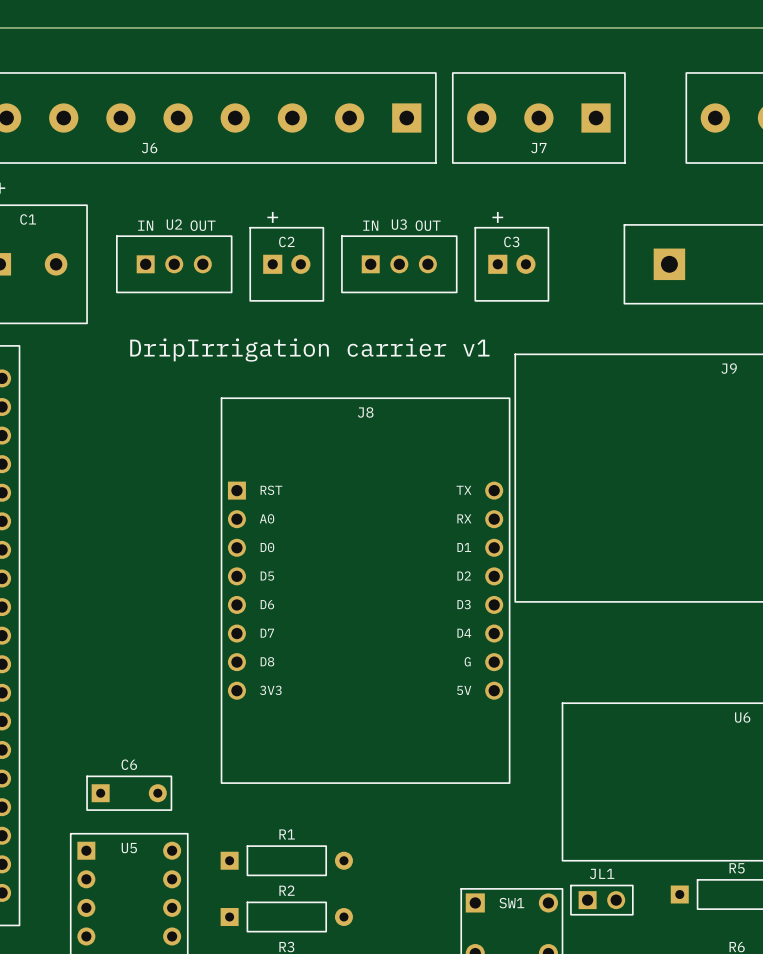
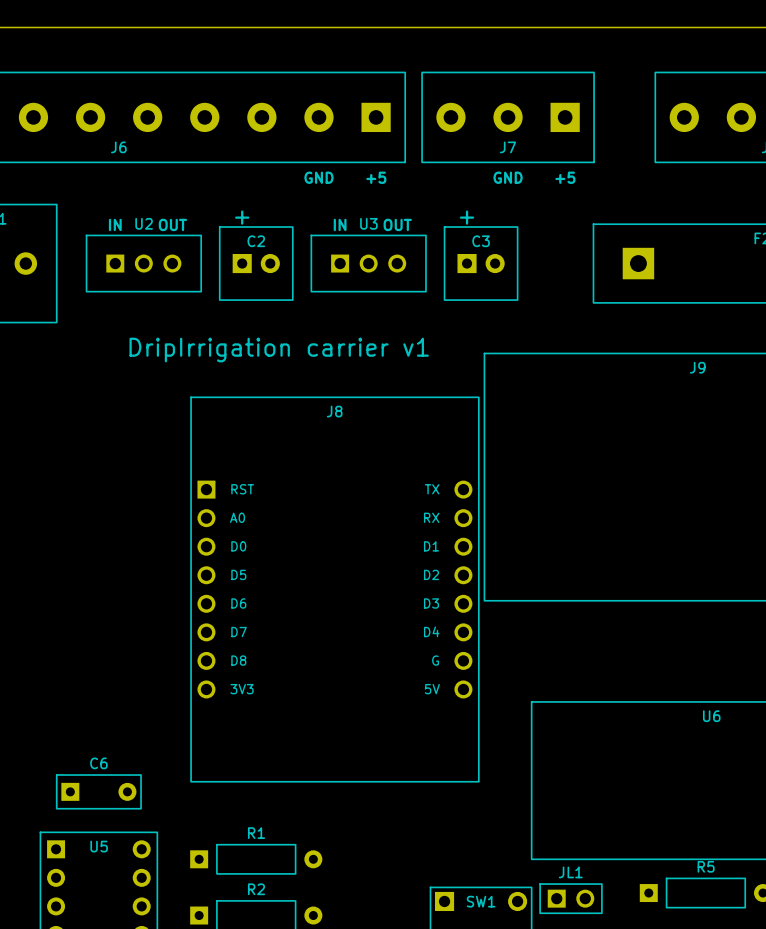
text: none -> GND (318, 177)
text: none -> +5 (376, 177)
text: none -> GND (508, 177)
text: none -> +5 (565, 177)

